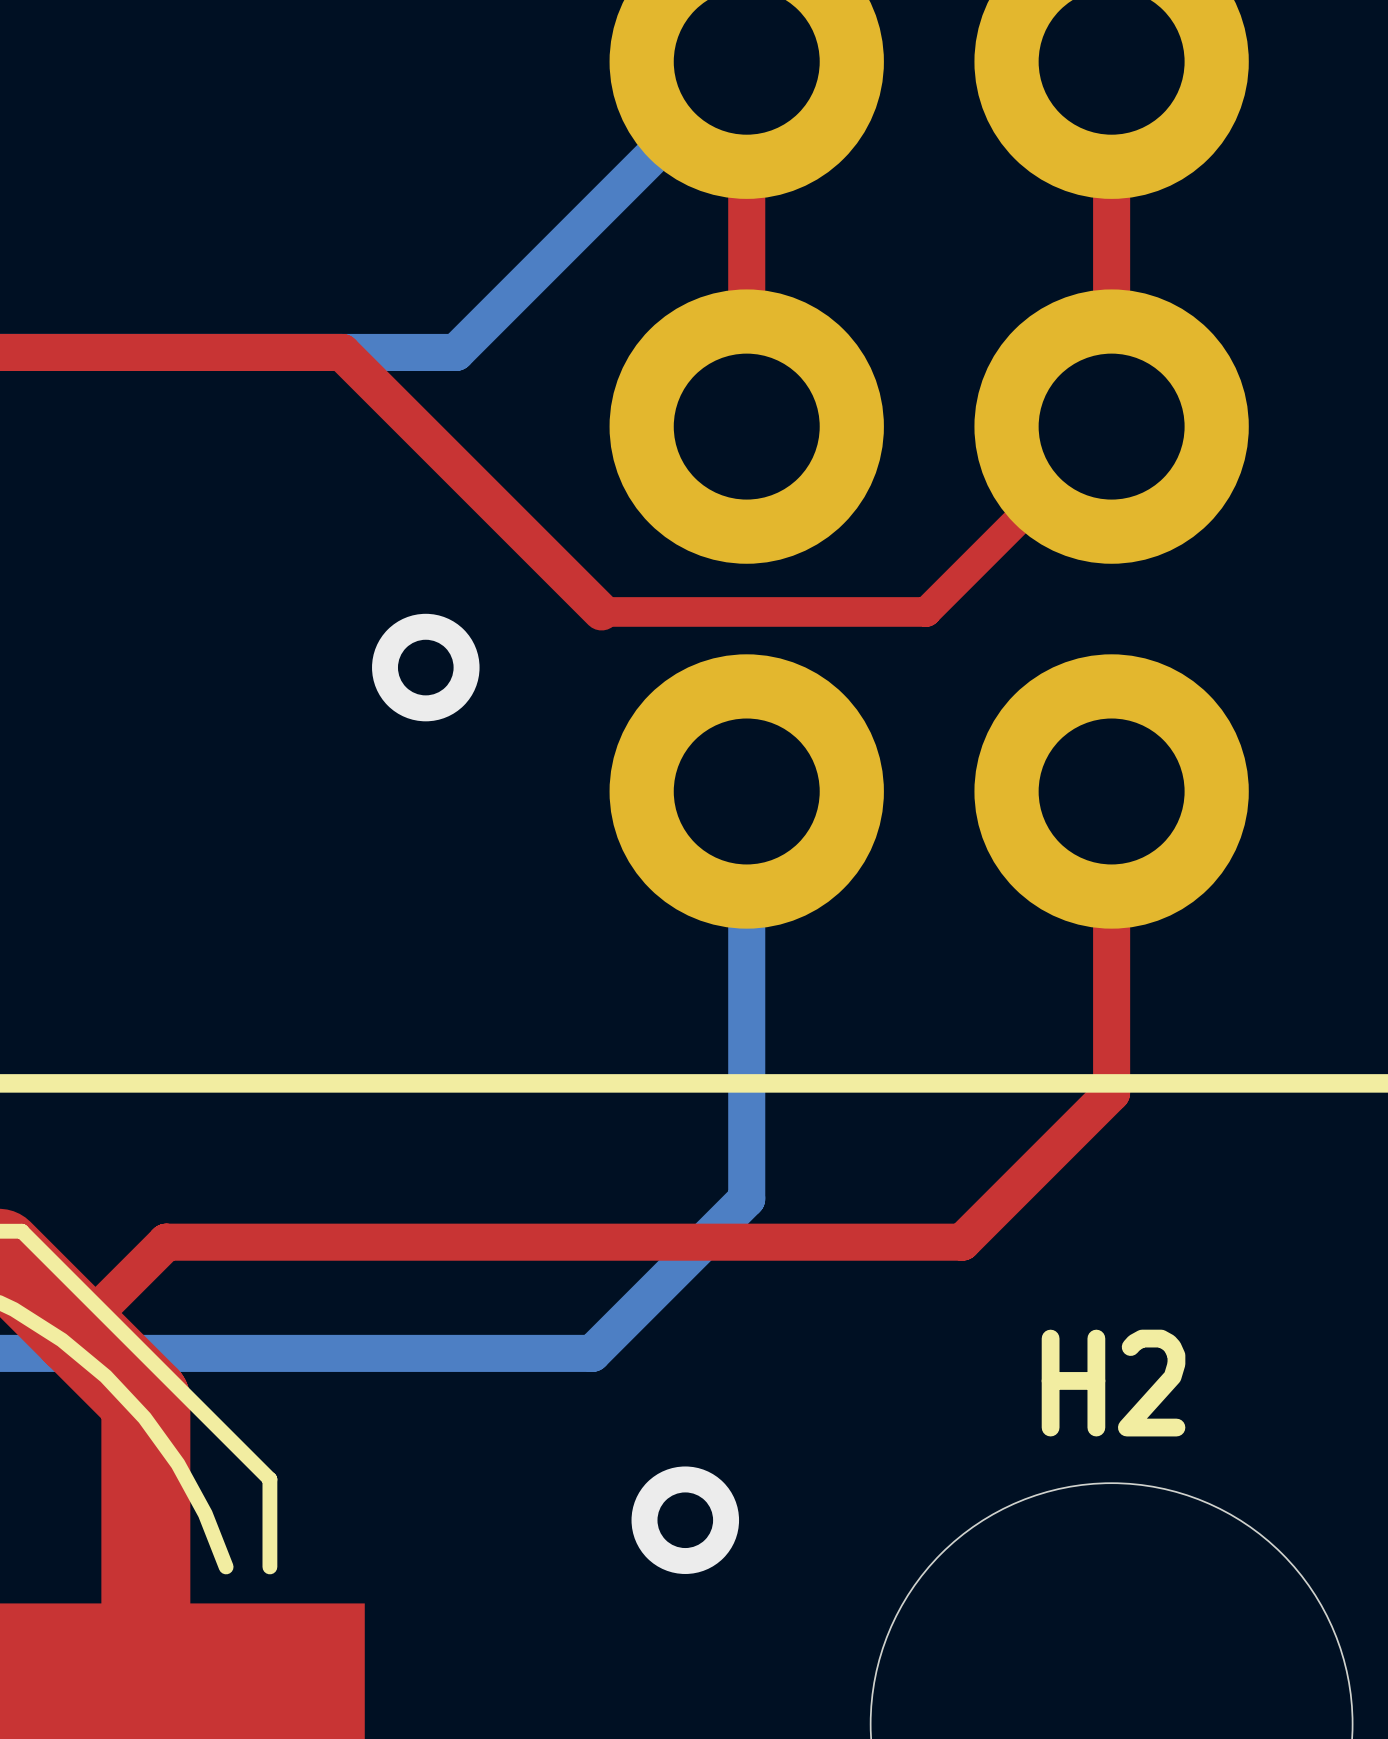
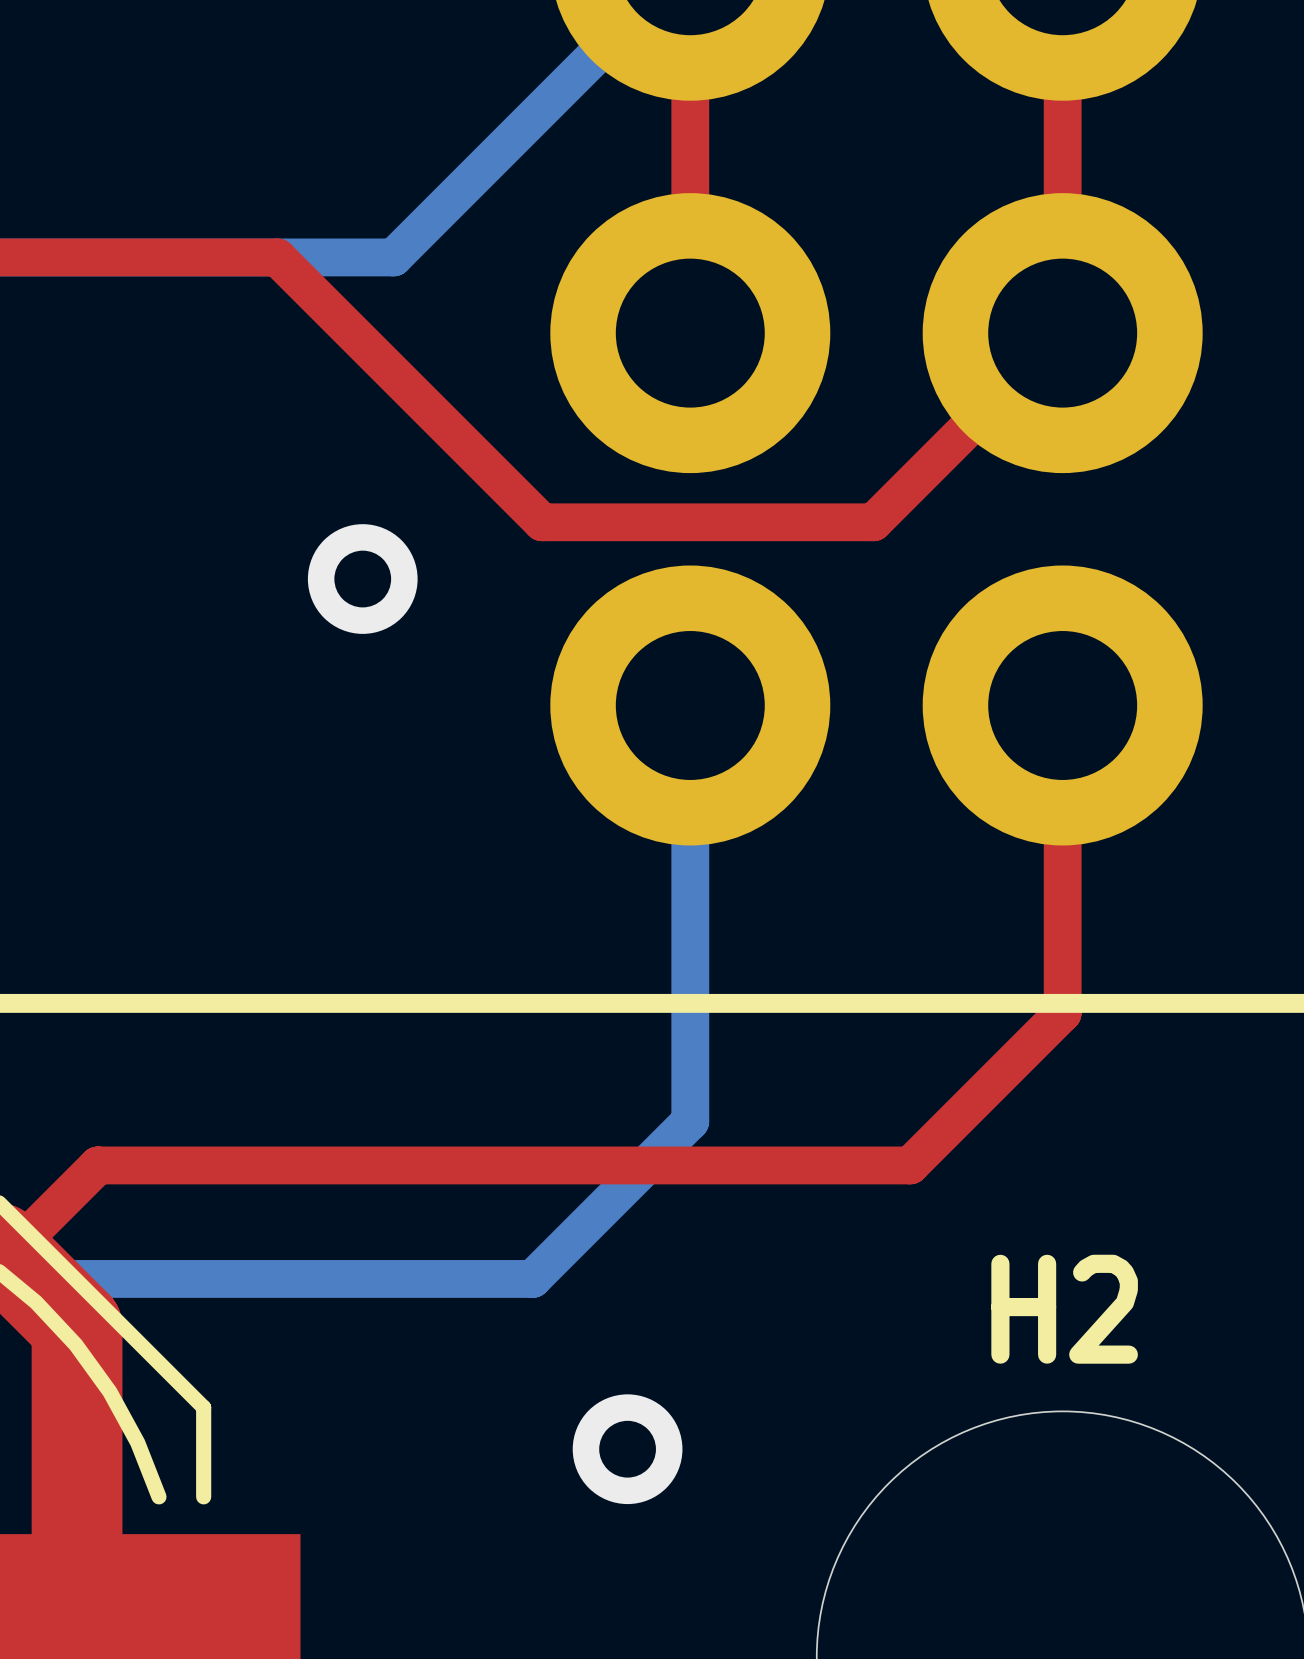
top track width: thin (1111, 426) (926, 611) (601, 611) -> thick (1062, 333) (873, 522) (542, 522)

